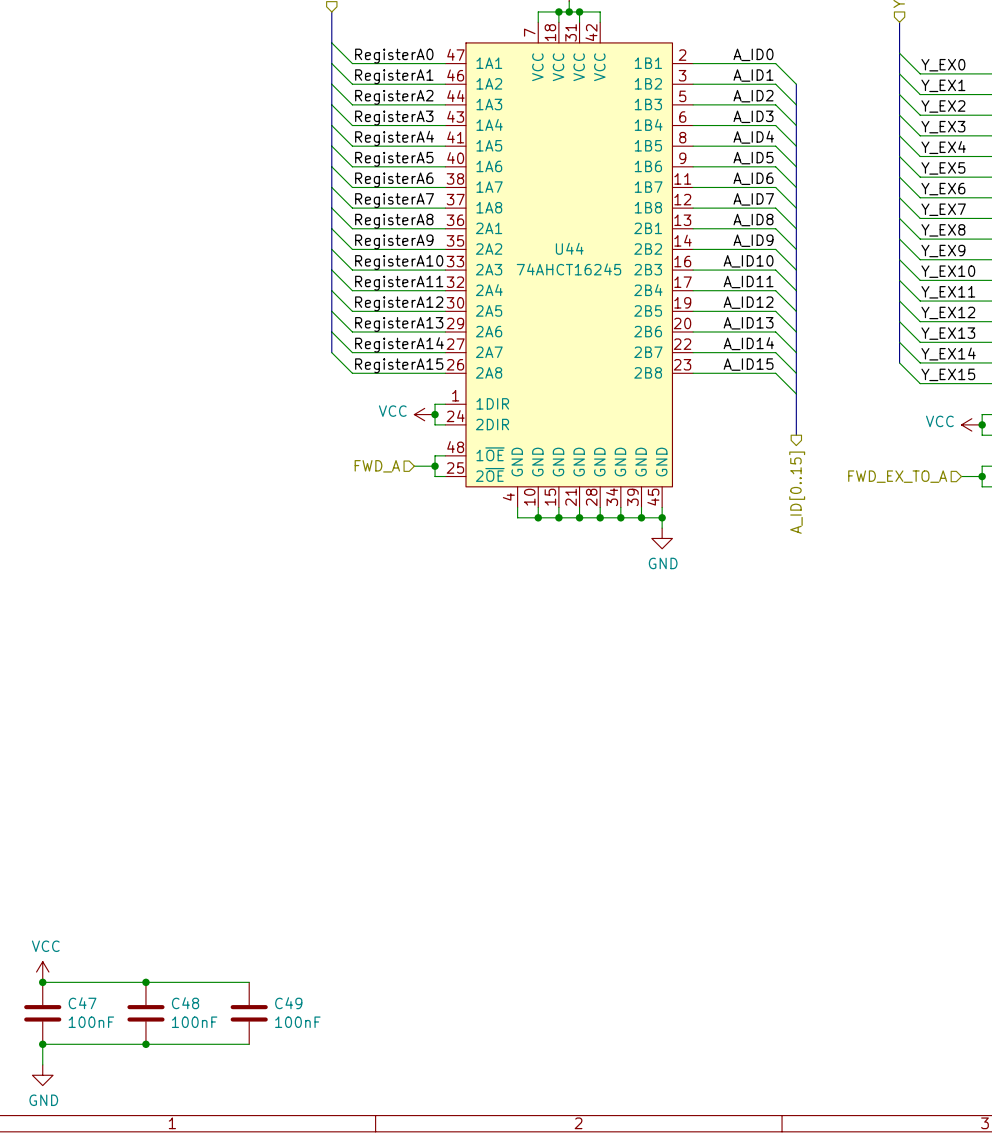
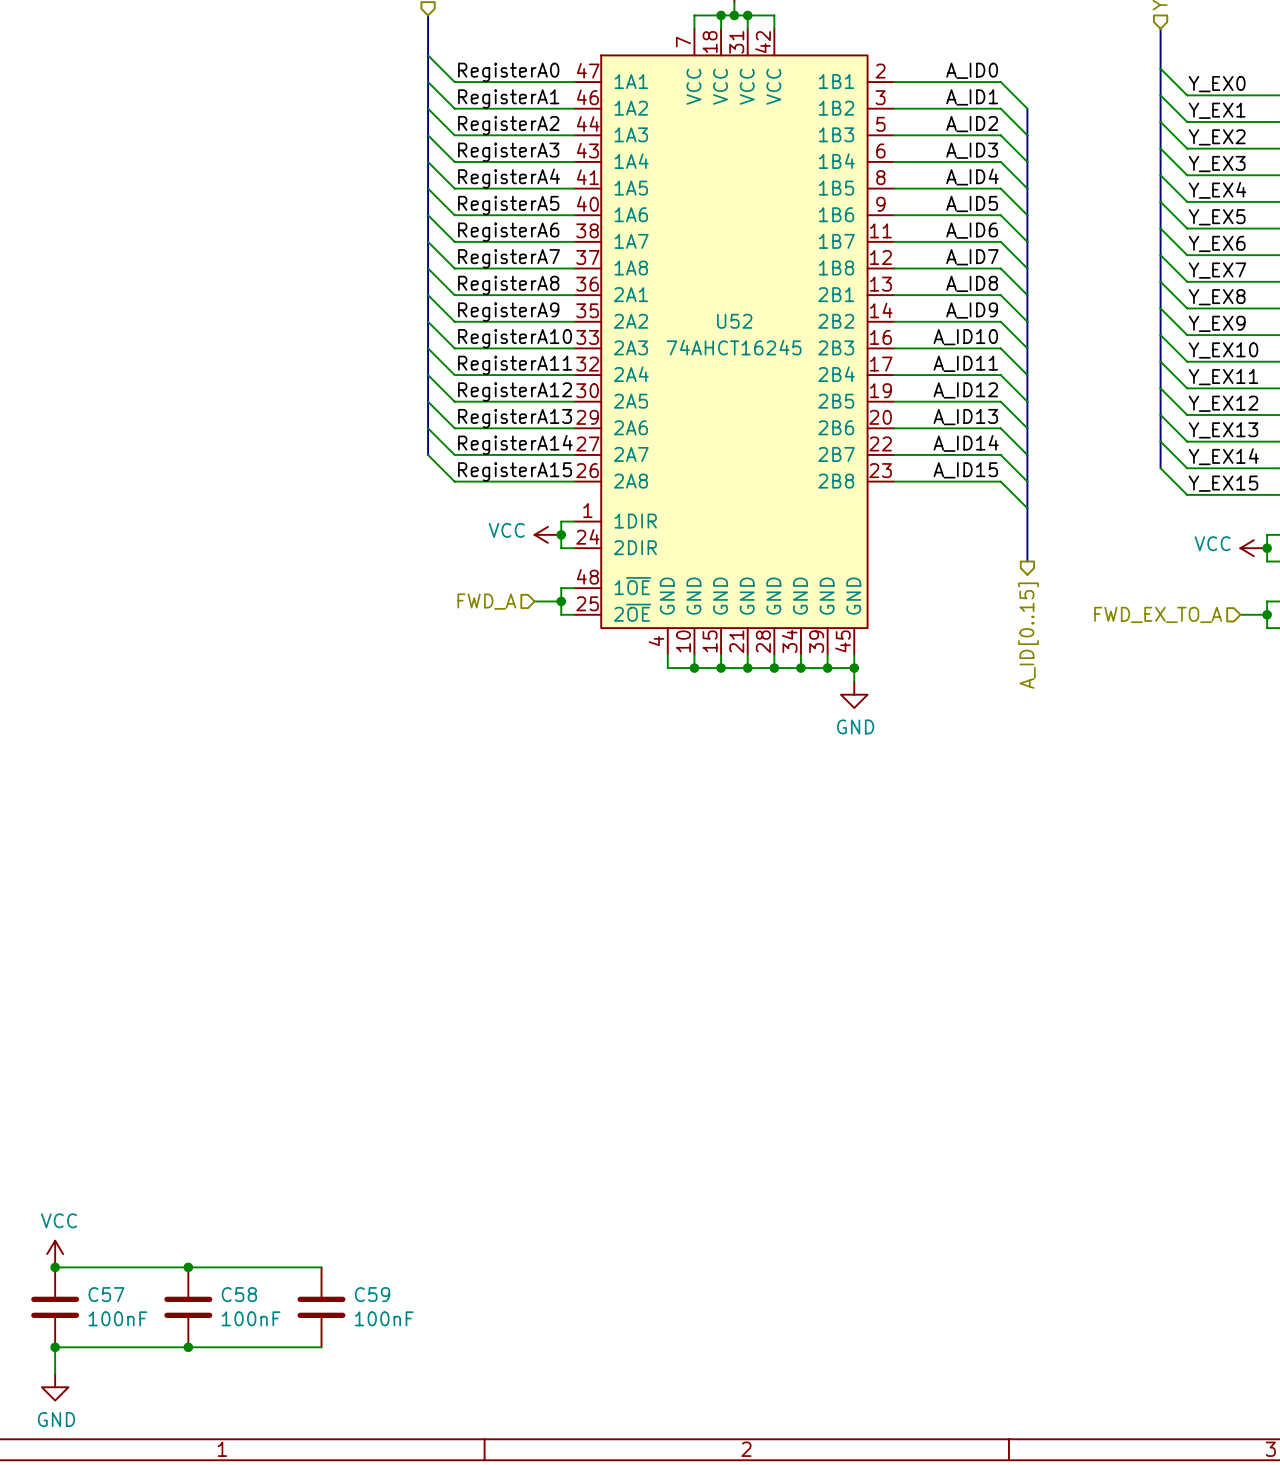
U44 name: U44 (569, 248) -> U52 (734, 321)
C47 name: C47 (82, 1003) -> C57 (106, 1294)
C48 name: C48 (185, 1003) -> C58 (239, 1294)
C49 name: C49 (288, 1003) -> C59 (372, 1294)

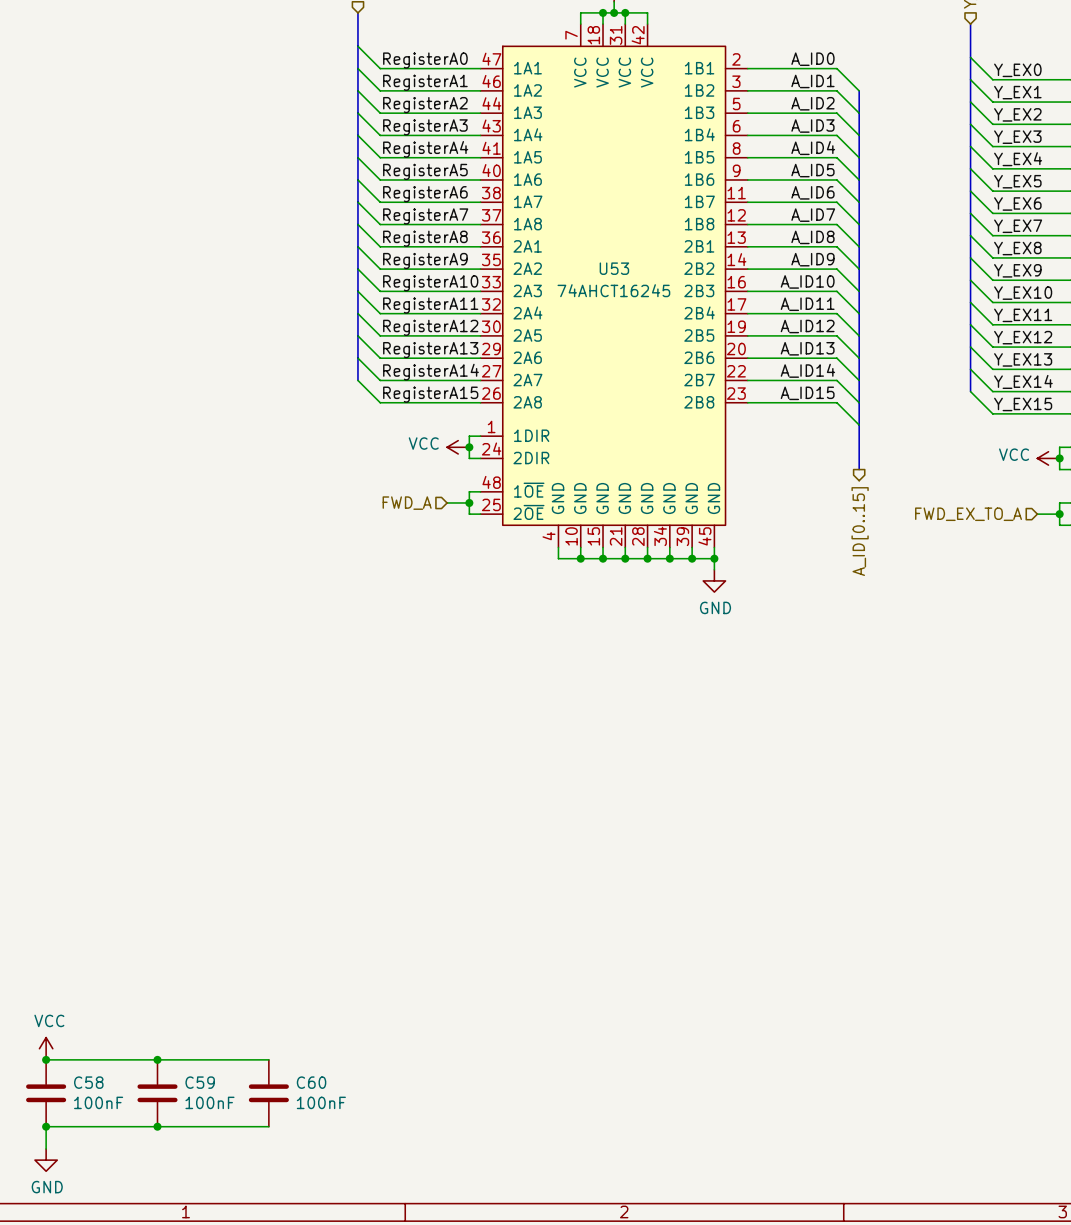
U52 name: U52 (734, 321) -> U53 (614, 268)
C57 name: C57 (106, 1294) -> C58 (88, 1082)
C58 name: C58 (239, 1294) -> C59 (200, 1082)
C59 name: C59 (372, 1294) -> C60 (311, 1082)

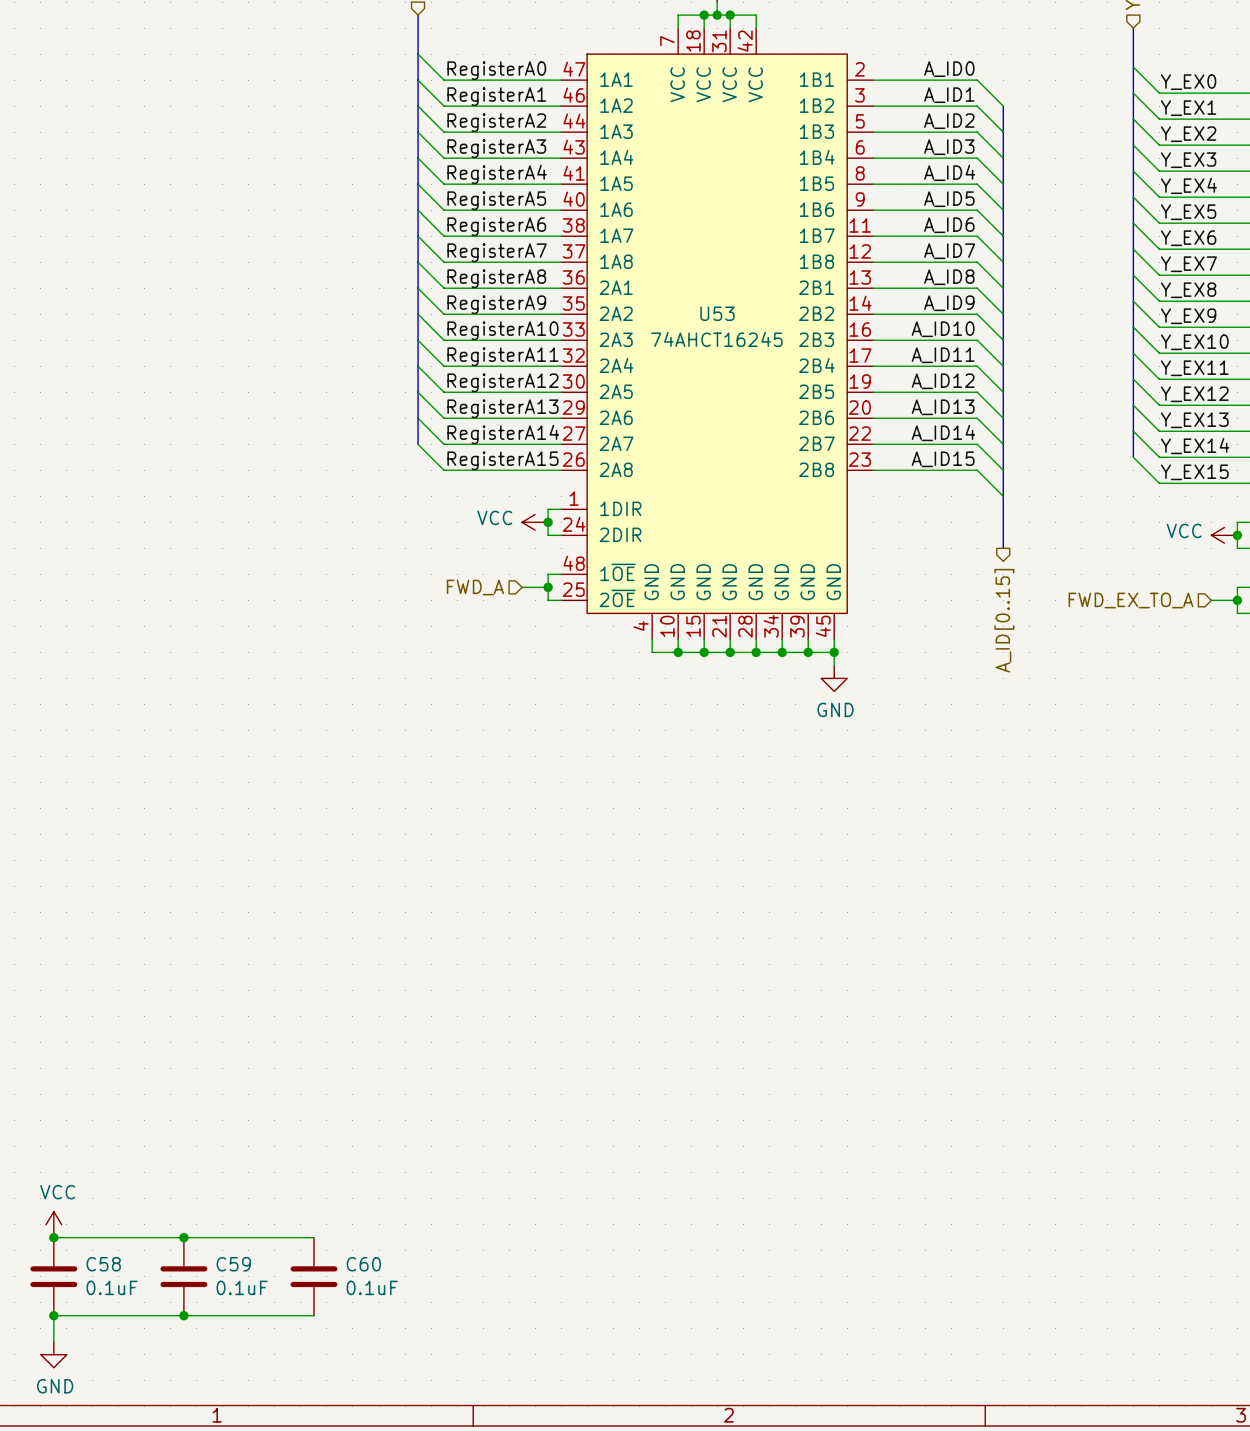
C58 value: 100nF (98, 1102) -> 0.1uF (112, 1287)
C59 value: 100nF (209, 1102) -> 0.1uF (242, 1287)
C60 value: 100nF (321, 1102) -> 0.1uF (372, 1287)

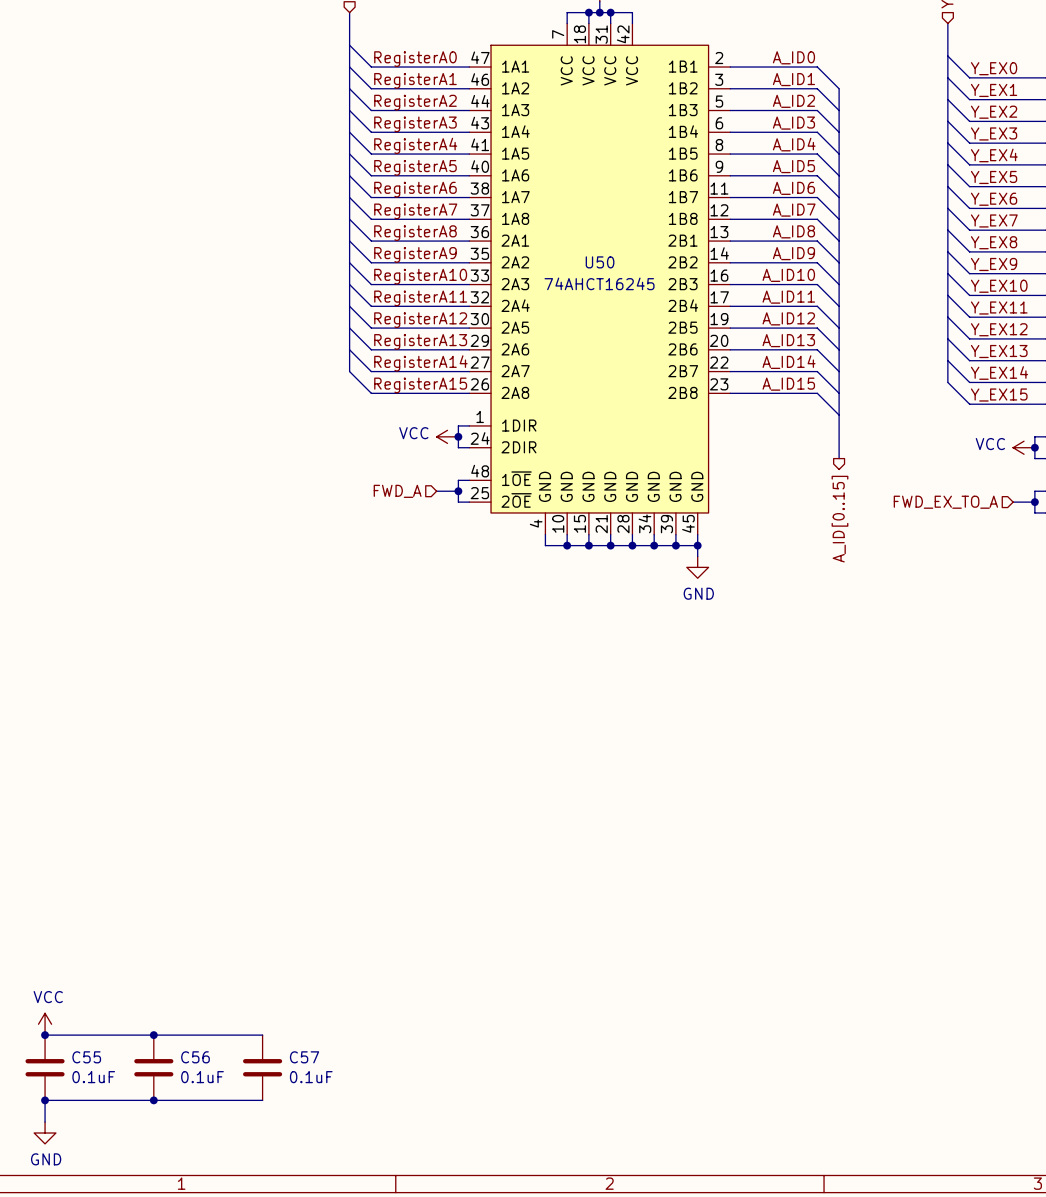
U53 name: U53 (717, 313) -> U50 (600, 262)
C58 name: C58 (103, 1264) -> C55 (86, 1057)
C59 name: C59 (233, 1264) -> C56 (195, 1057)
C60 name: C60 (363, 1264) -> C57 (304, 1057)

